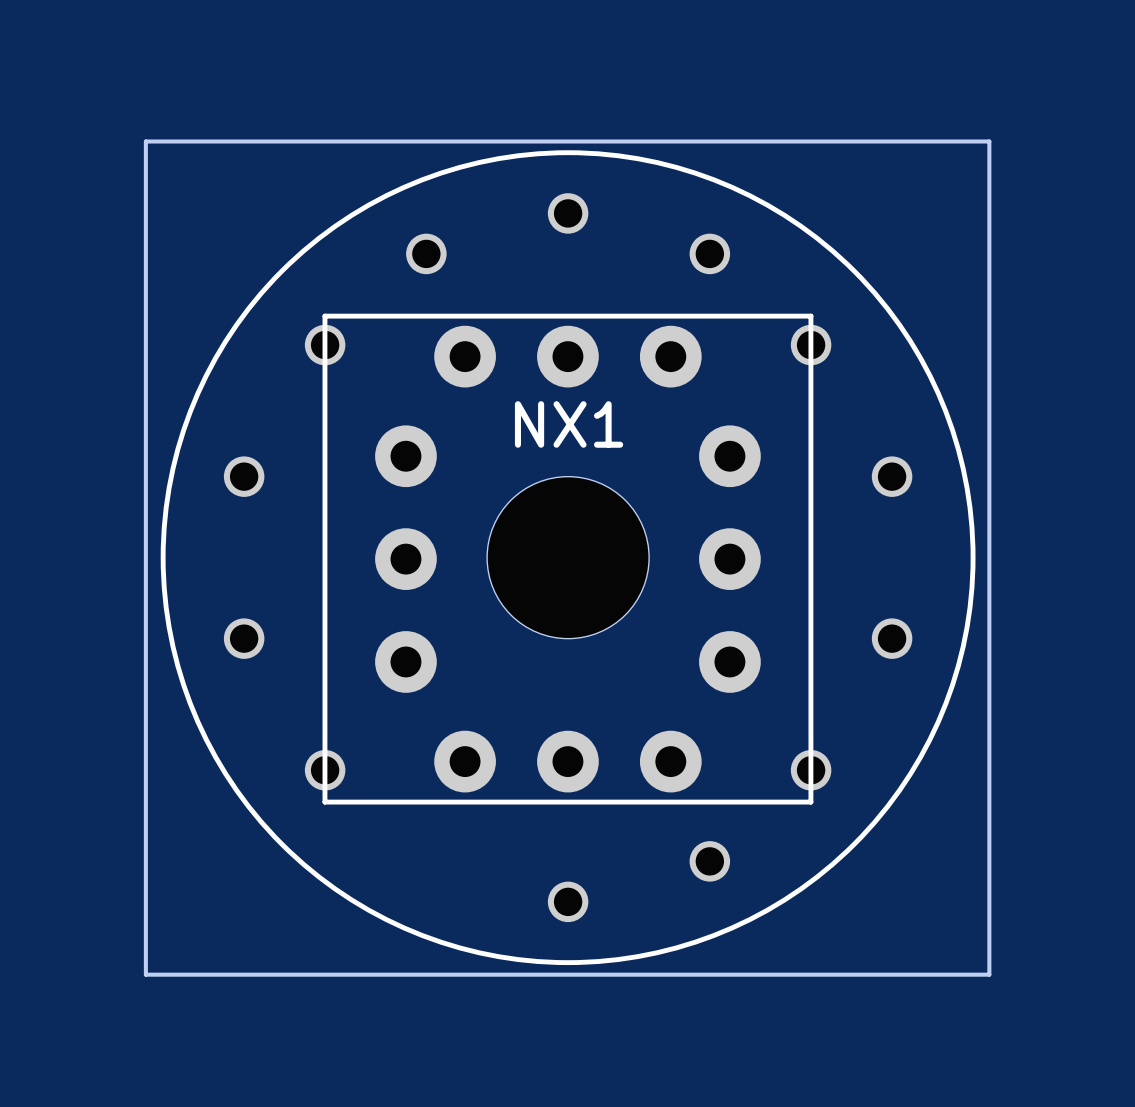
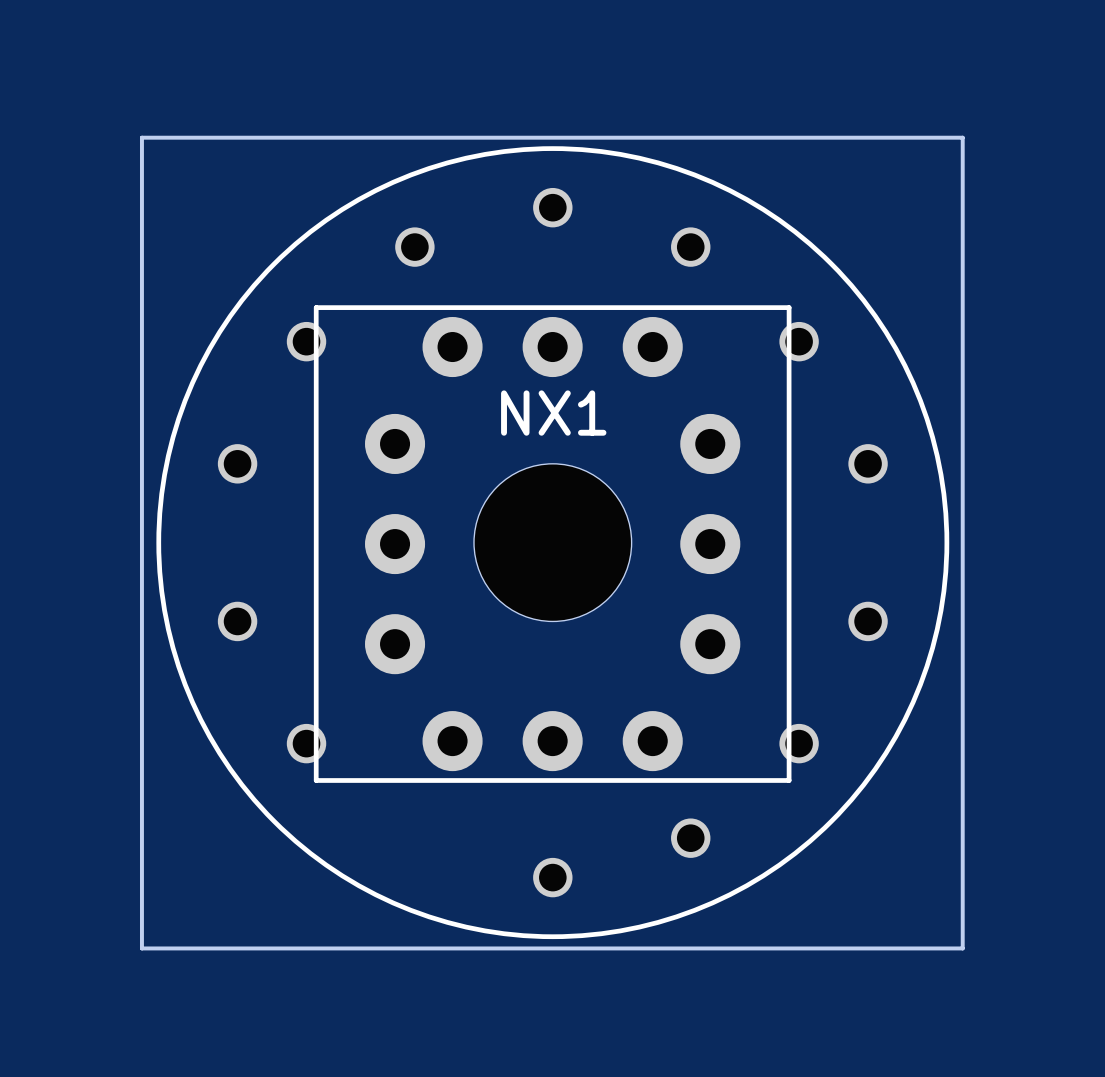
NX1 footprint: [160, 150, 976, 966] -> [156, 146, 950, 940]

